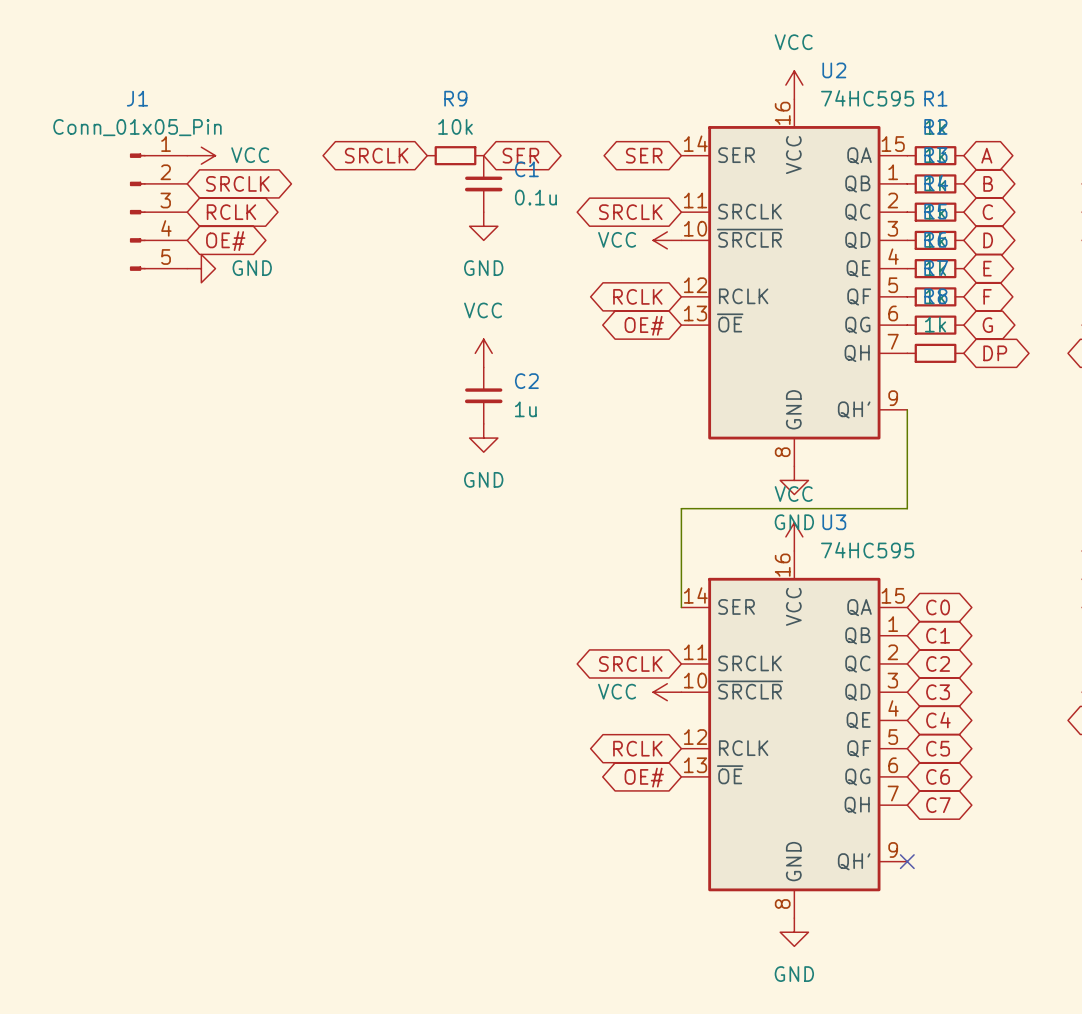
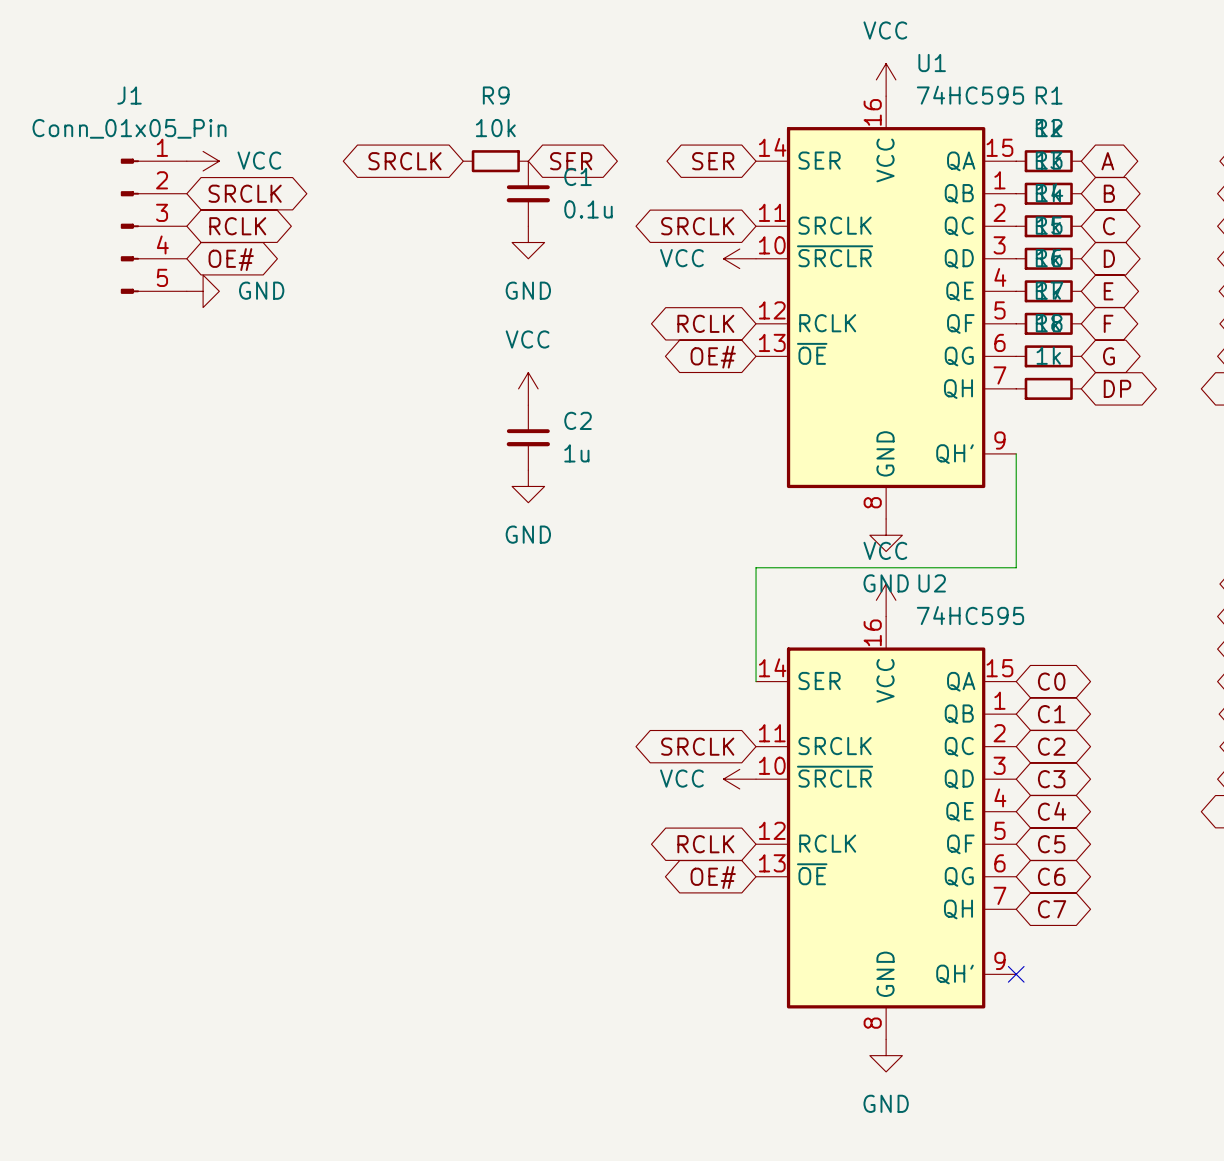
U2 name: U2 (834, 70) -> U1 (932, 63)
U3 name: U3 (834, 522) -> U2 (932, 583)

